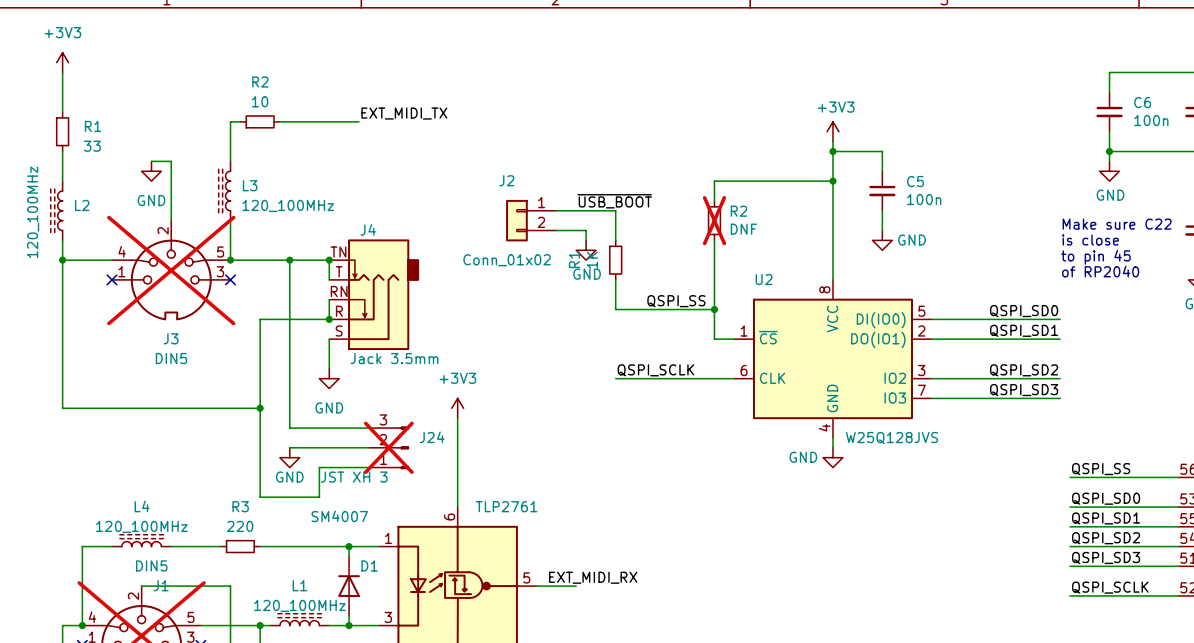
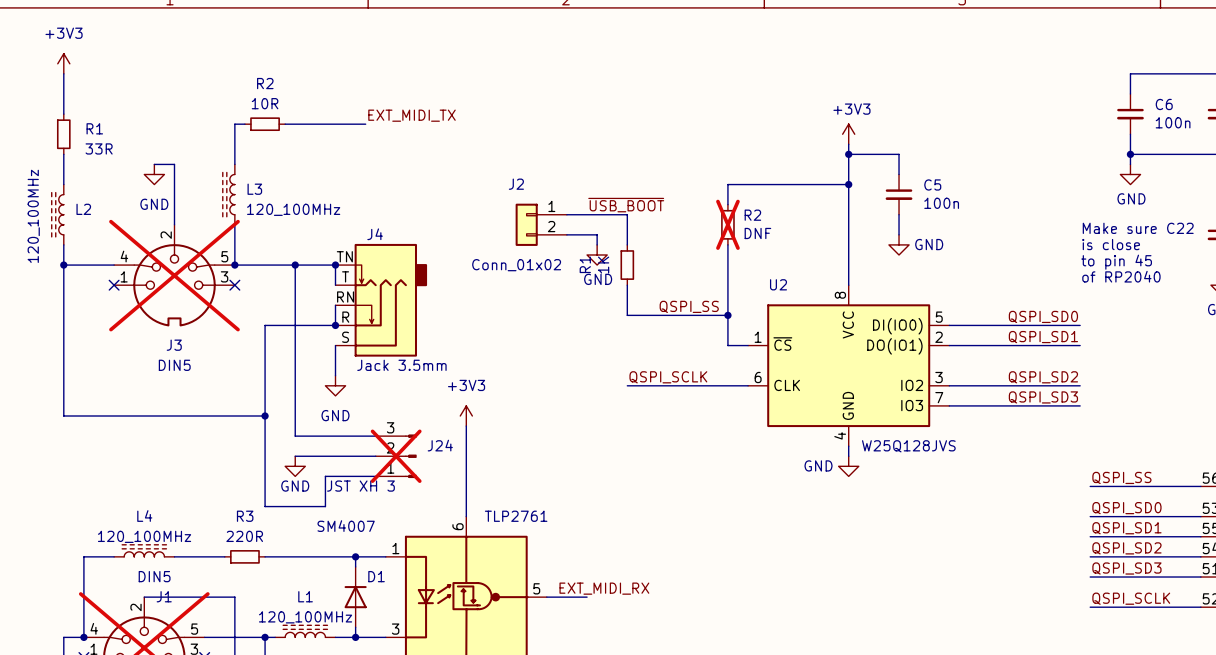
R2 value: 10 (260, 101) -> 10R (265, 103)
R1 value: 33 (92, 146) -> 33R (99, 148)
R3 value: 220 (240, 526) -> 220R (244, 536)

